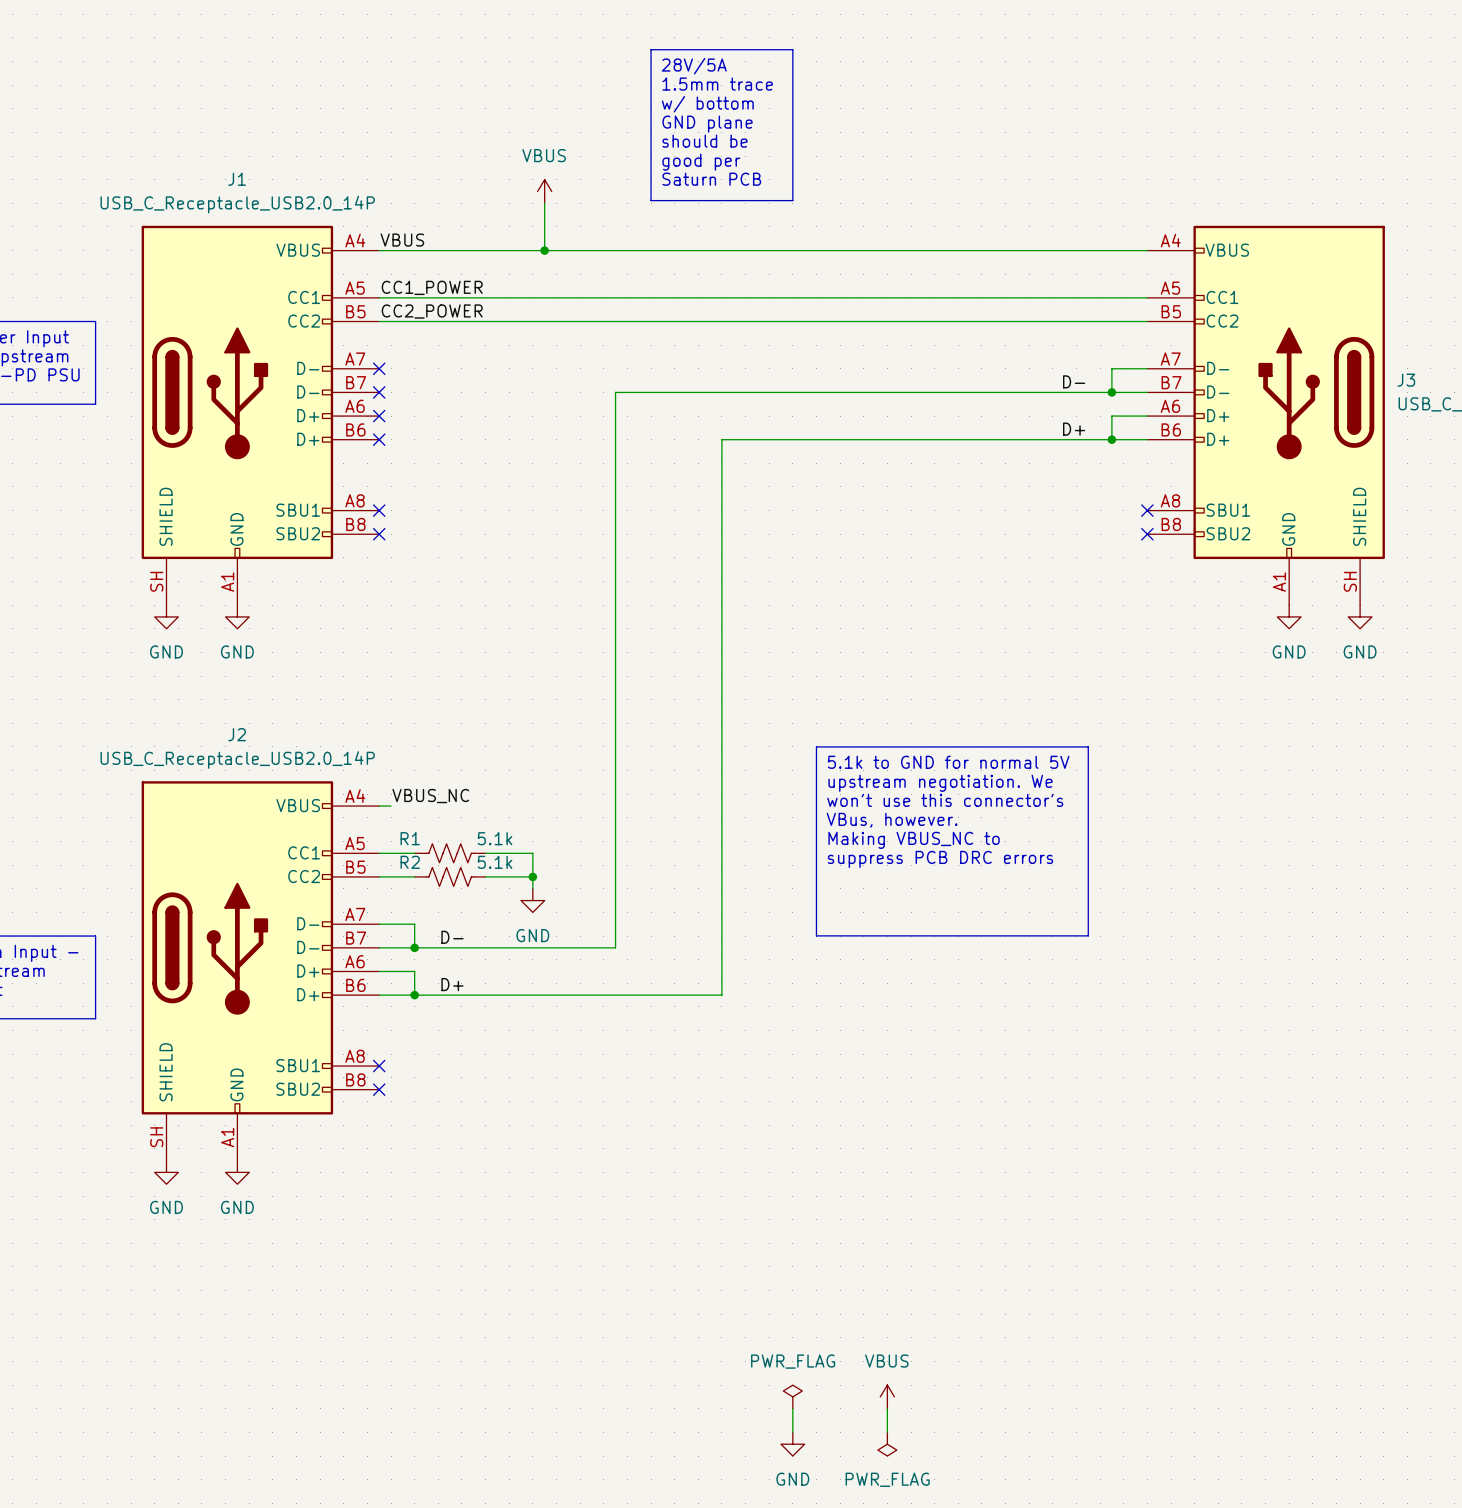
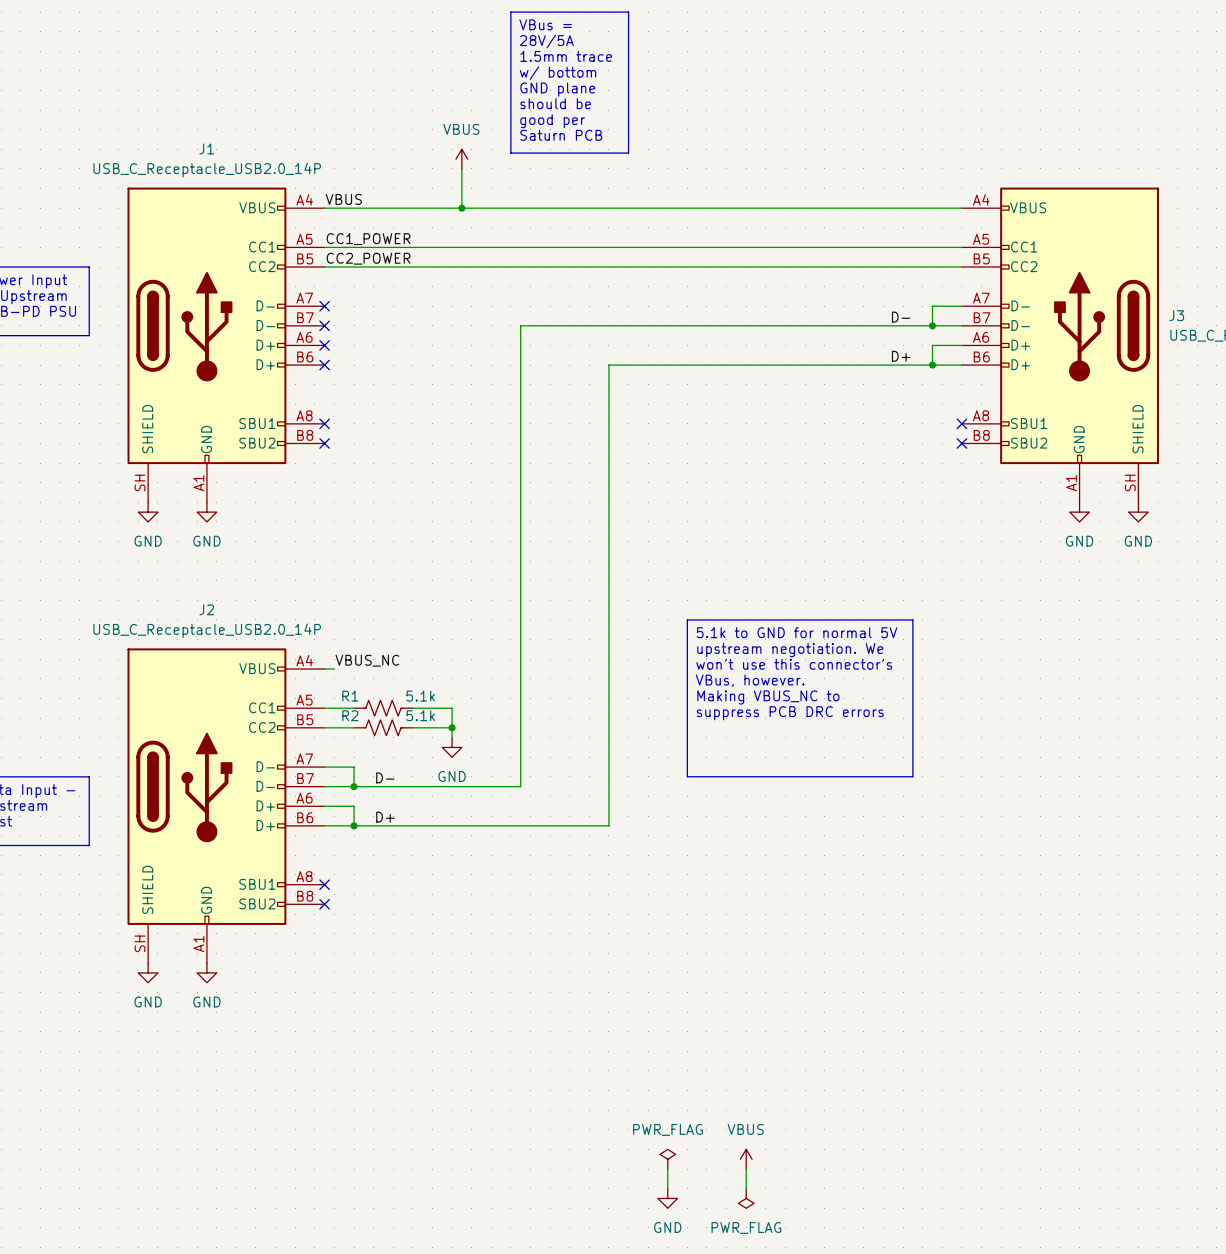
line: none -> (510, 12) (628, 12) (628, 153) (510, 153) (510, 12)
text: none -> VBus = (545, 24)
line: (651, 49) (792, 49) (792, 200) (651, 200) (651, 49) -> none
text position: 28V/5A (694, 66) -> 28V/5A (546, 41)
text position: 1.5mm trace (717, 84) -> 1.5mm trace (566, 56)
text position: w/ bottom (707, 104) -> w/ bottom (558, 73)
text position: GND plane (707, 124) -> GND plane (557, 89)
text position: should be (704, 141) -> should be (555, 103)
text position: good per (701, 162) -> good per (552, 121)
text position: Saturn PCB (711, 179) -> Saturn PCB (561, 135)

